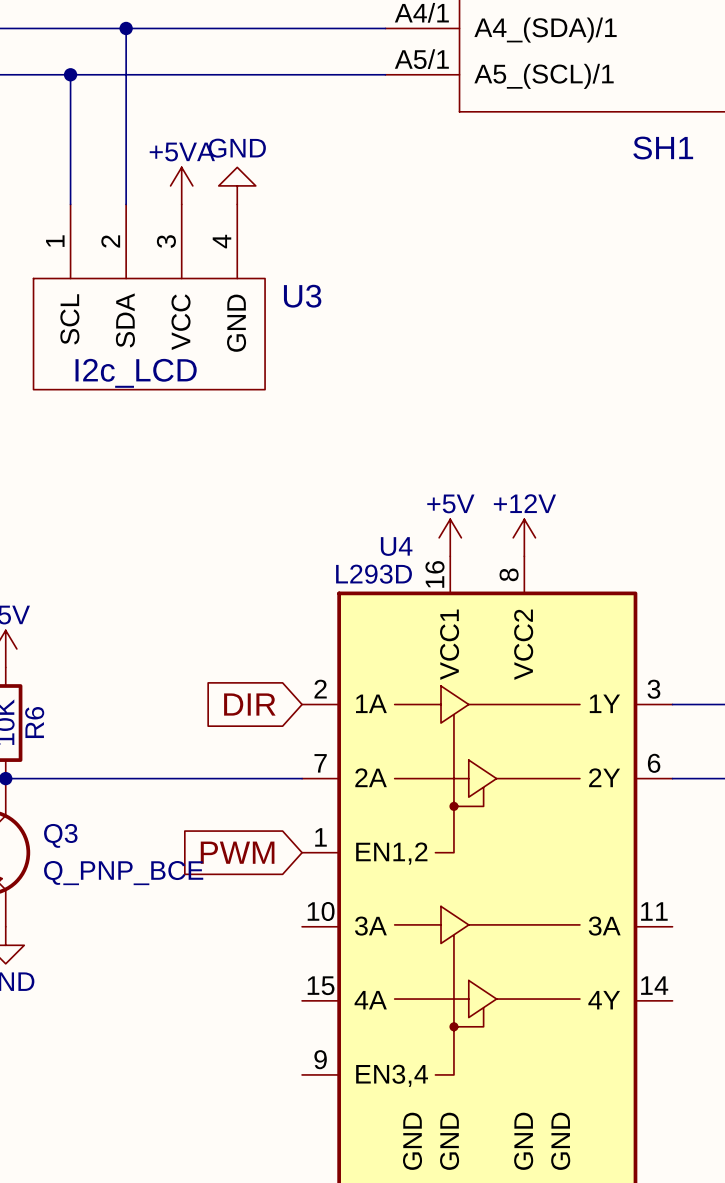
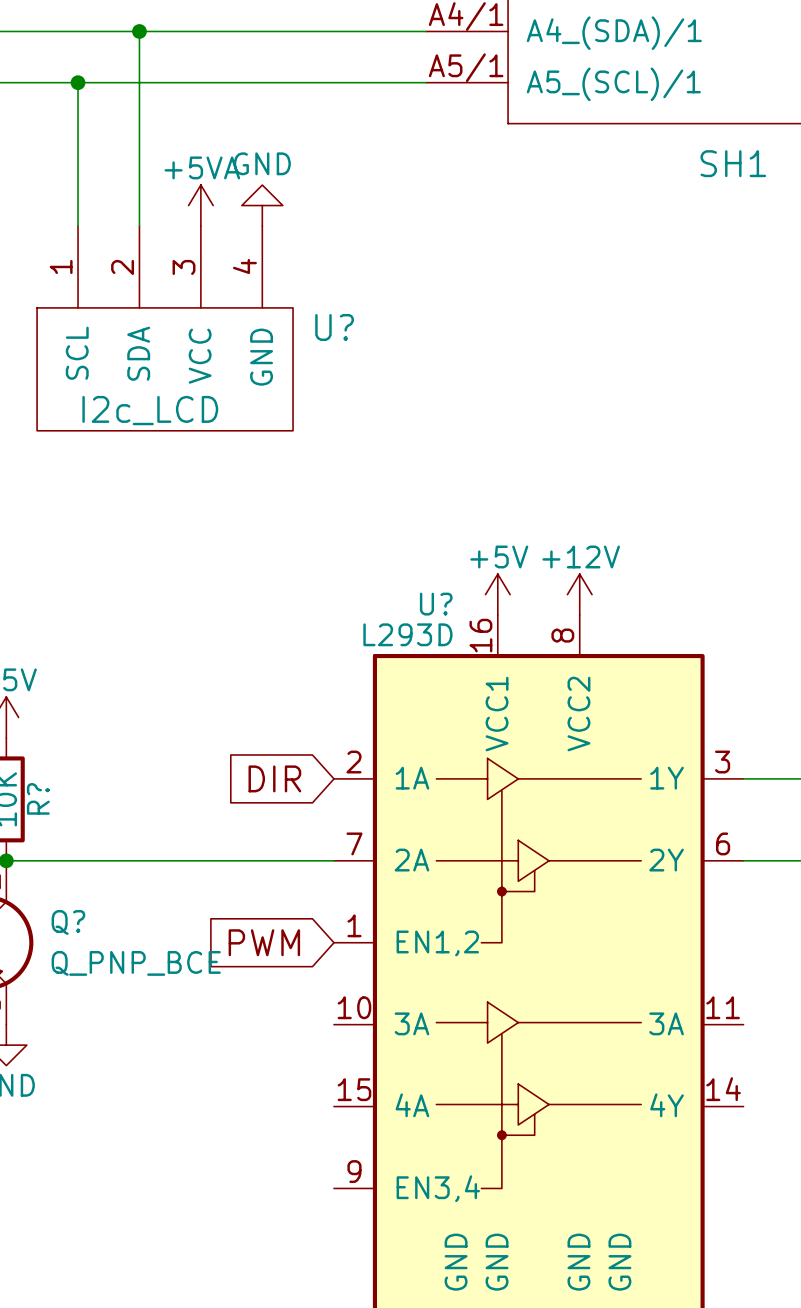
U3 name: U3 (302, 296) -> U? (334, 327)
U4 name: U4 (396, 546) -> U? (436, 604)
R6 name: R6 (34, 722) -> R? (38, 798)
Q3 name: Q3 (60, 835) -> Q? (68, 922)

